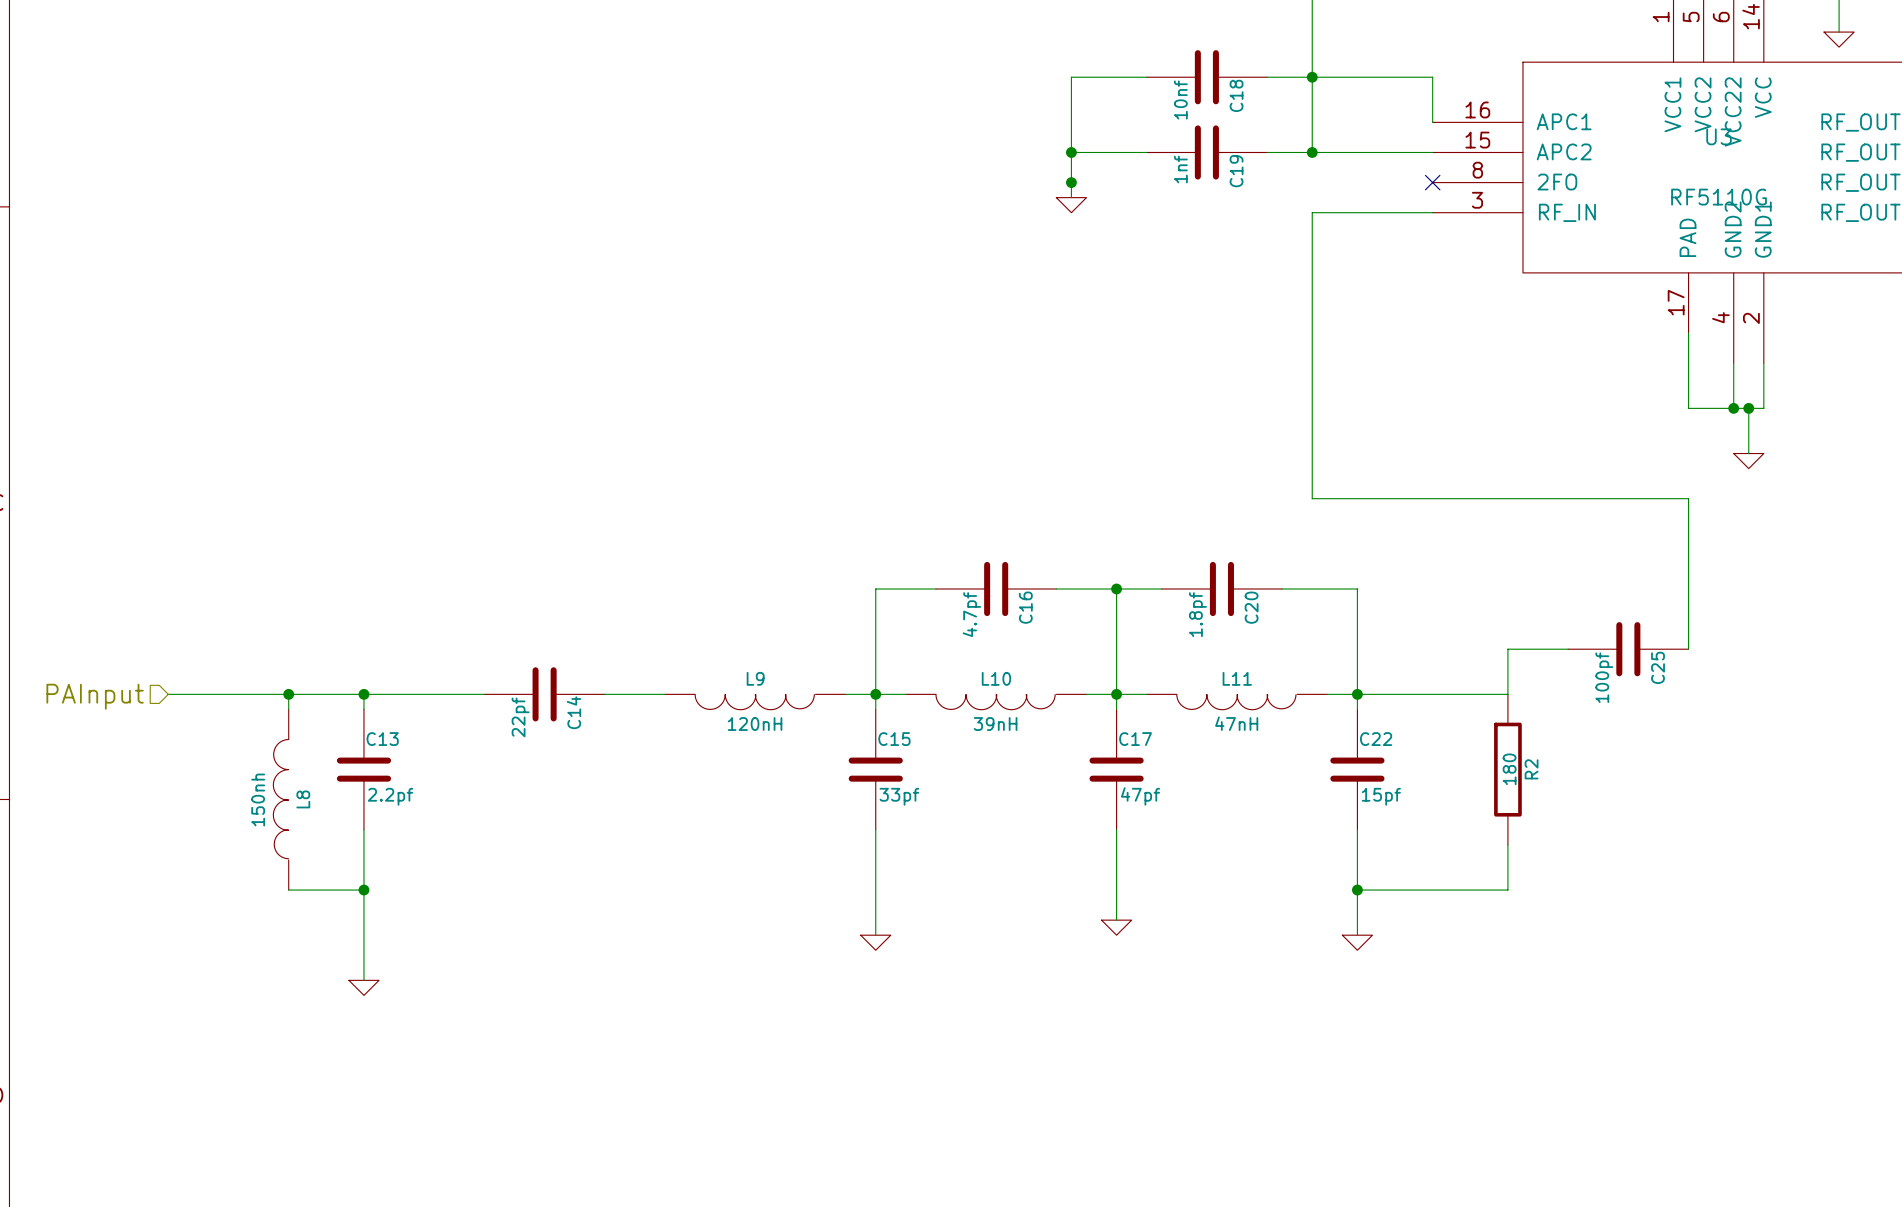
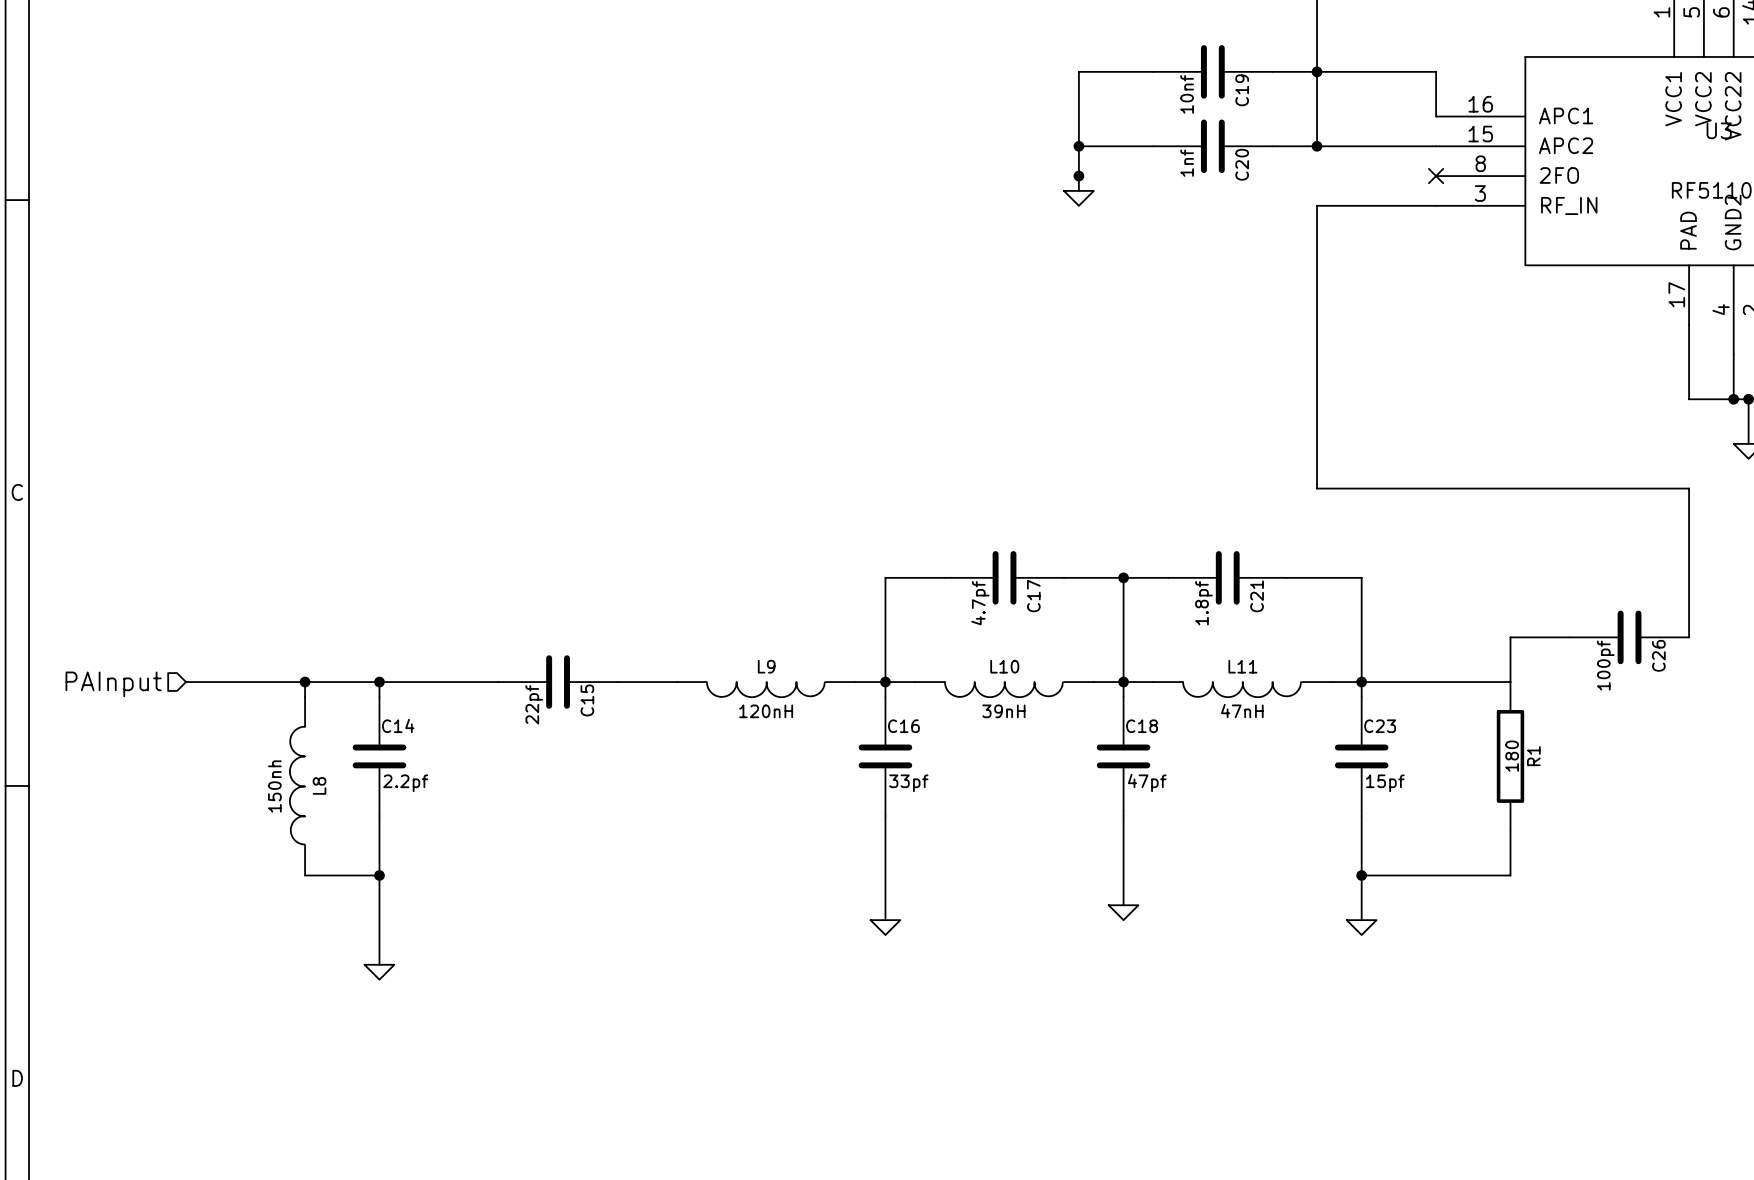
C18 name: C18 (1236, 95) -> C19 (1242, 90)
C19 name: C19 (1236, 171) -> C20 (1242, 164)
C16 name: C16 (1025, 607) -> C17 (1033, 596)
C20 name: C20 (1251, 607) -> C21 (1257, 596)
C25 name: C25 (1658, 667) -> C26 (1658, 655)
C14 name: C14 (573, 712) -> C15 (587, 700)
C13 name: C13 (382, 739) -> C14 (398, 725)
C15 name: C15 (894, 739) -> C16 (903, 726)
C17 name: C17 (1135, 739) -> C18 (1142, 726)
C22 name: C22 (1376, 739) -> C23 (1380, 726)
R2 name: R2 (1531, 769) -> R1 (1533, 756)

